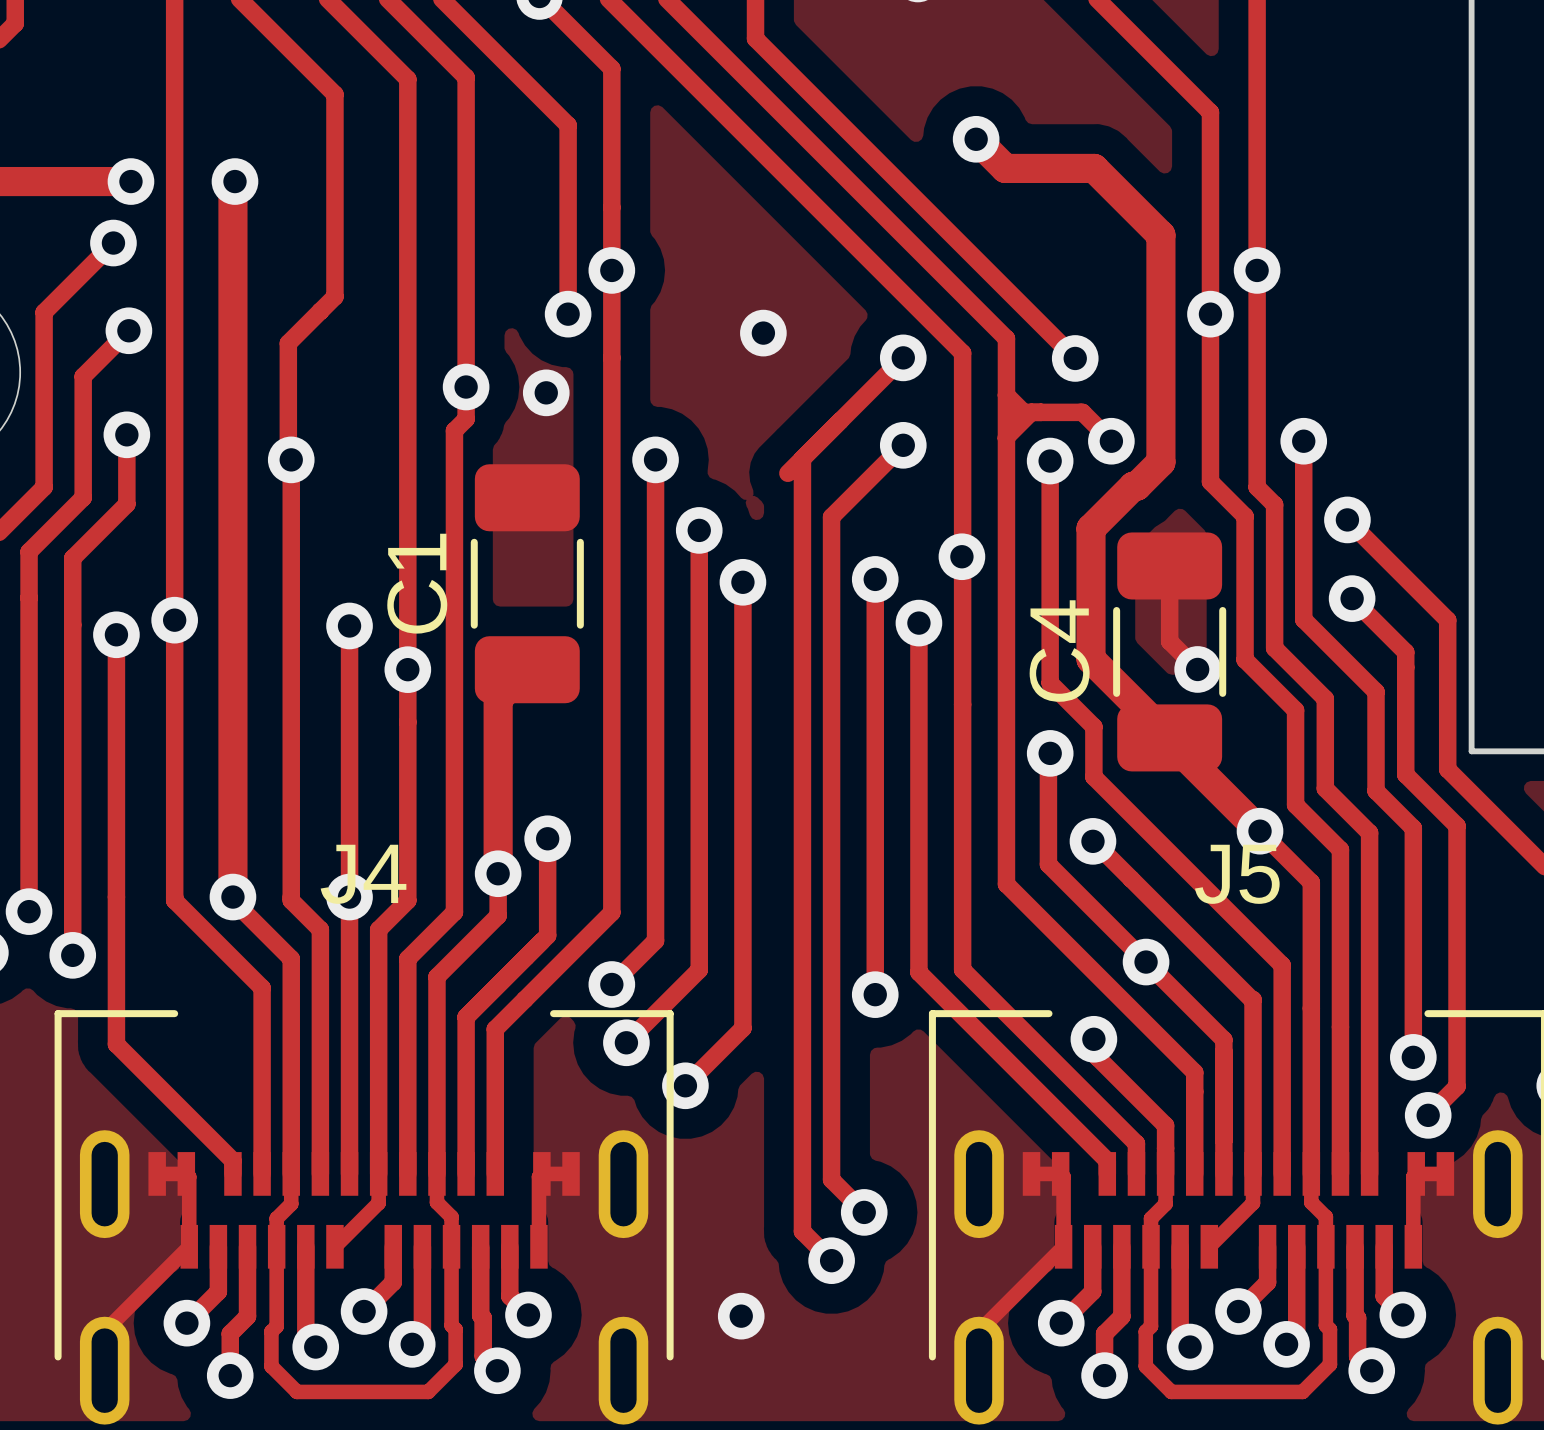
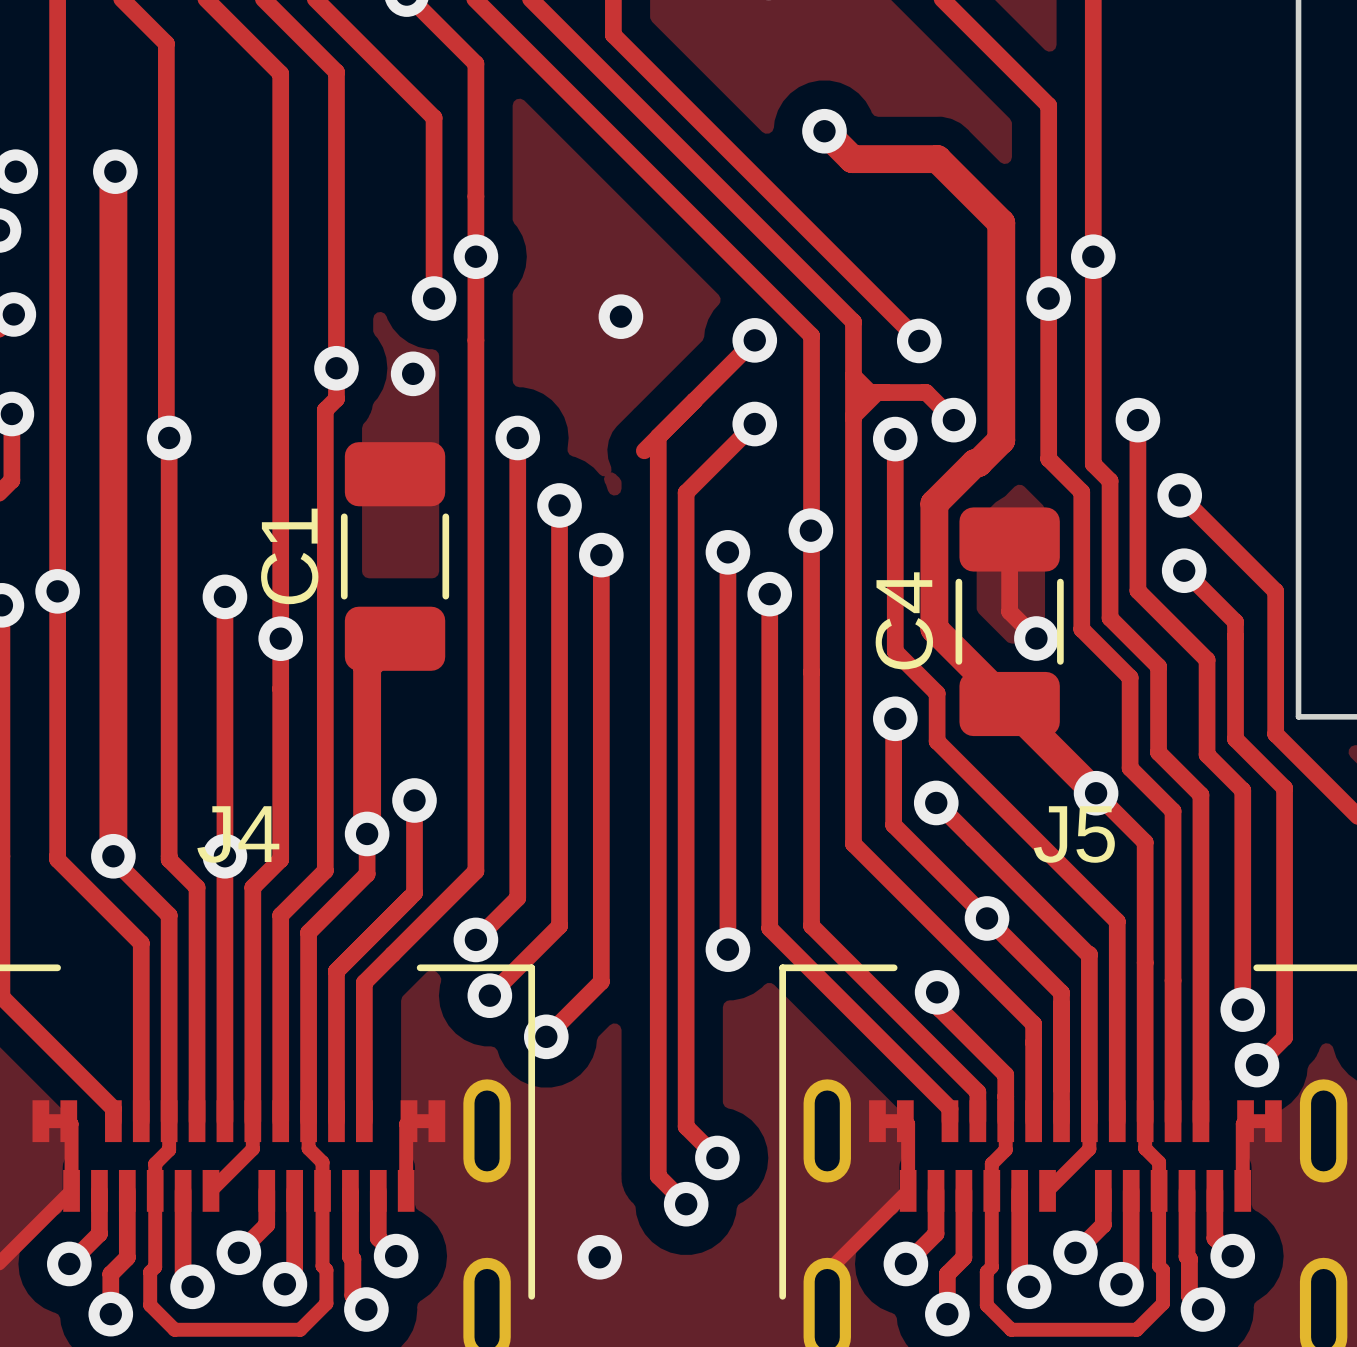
track: (288, 47) (334, 94) (334, 296) (288, 343) -> (166, 43) (166, 326)

